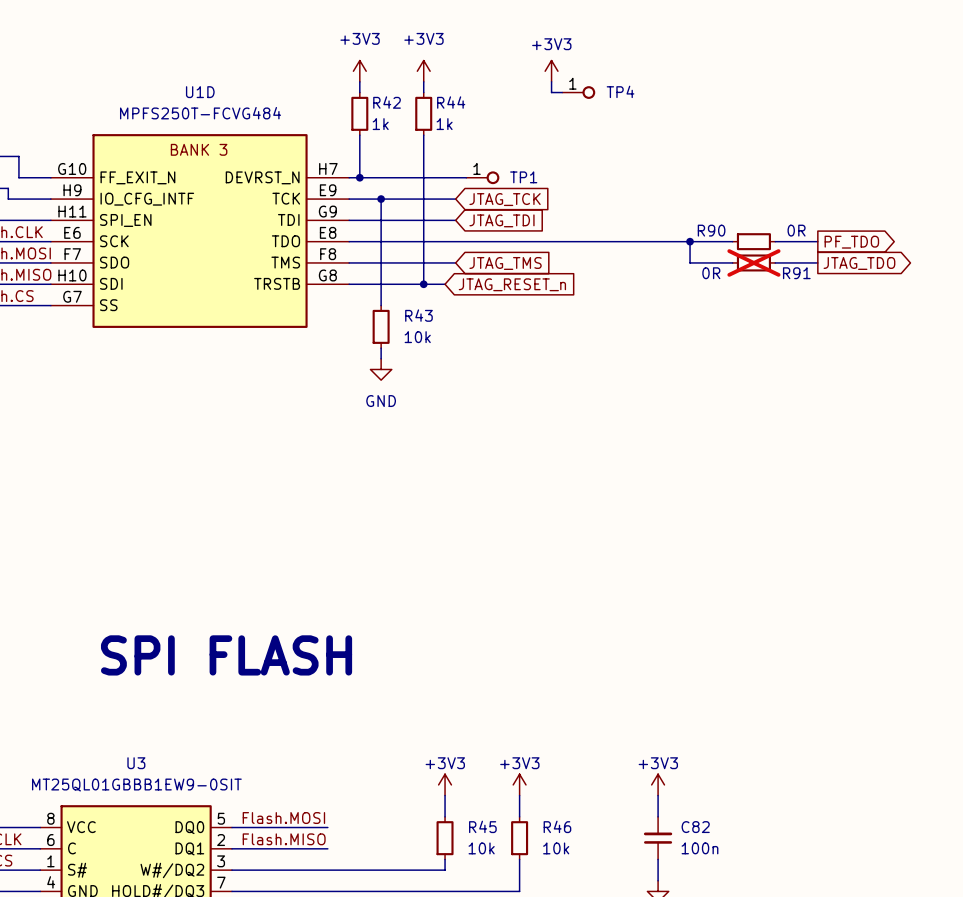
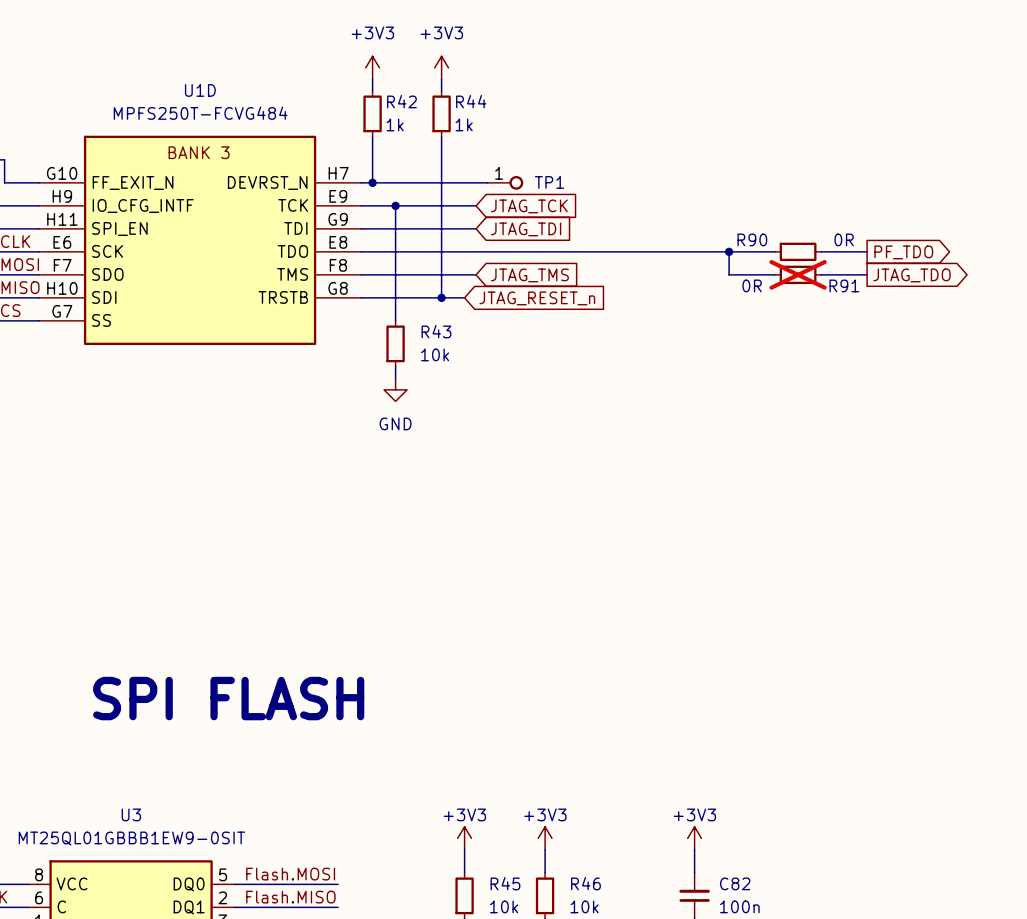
power symbol: +3V3 (551, 71) -> none
wire: (551, 81) (551, 92) (562, 92) -> none
TP4: (578, 92) -> none

